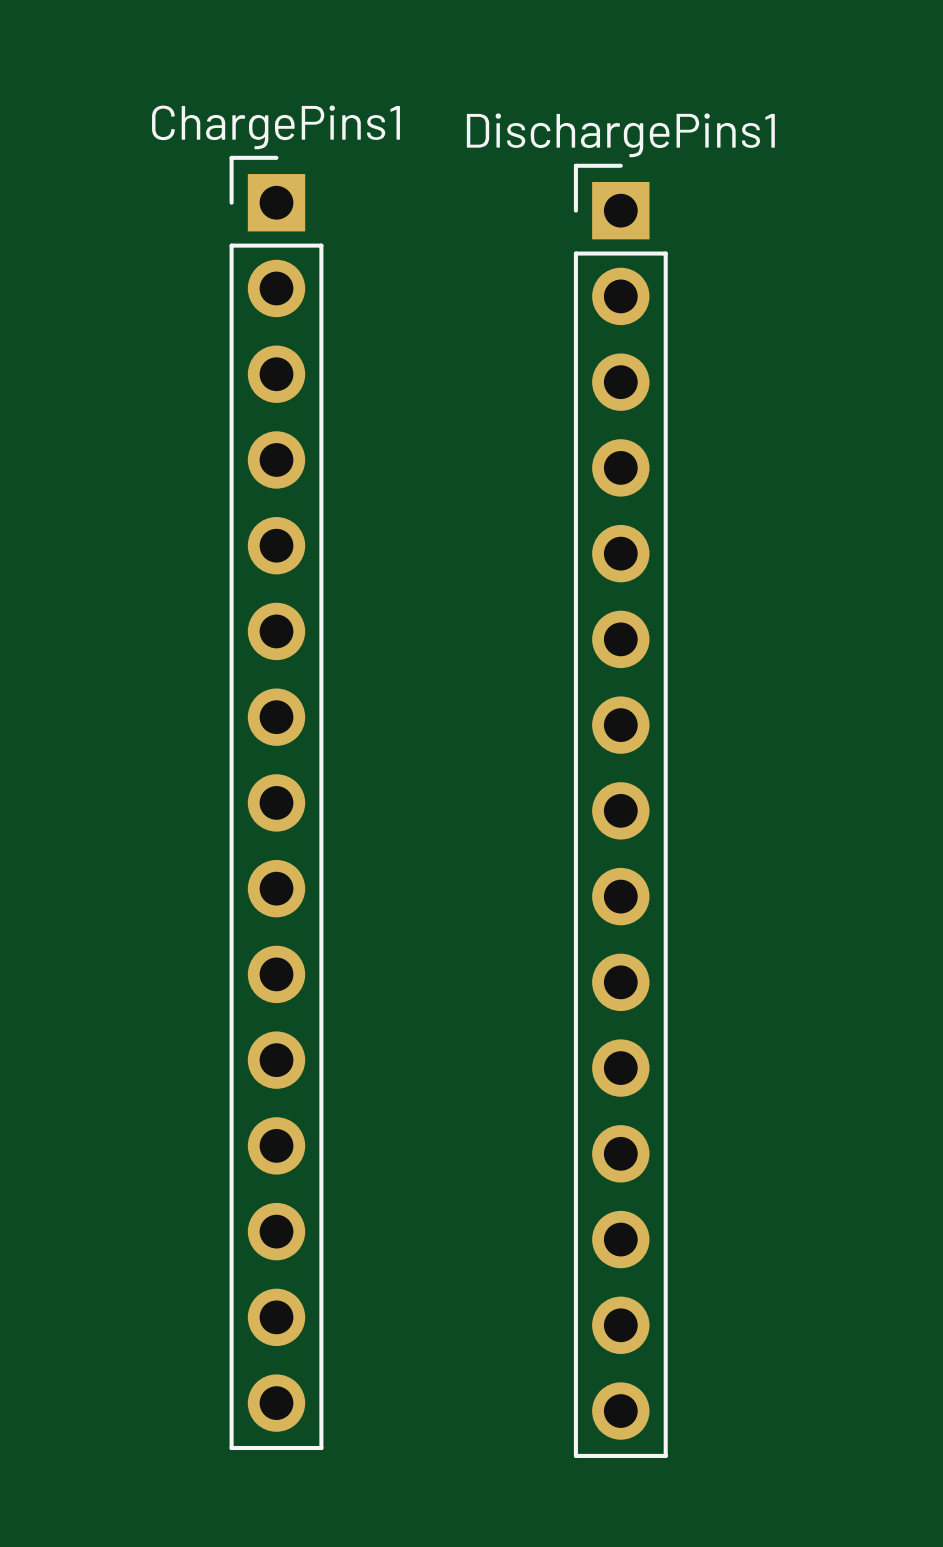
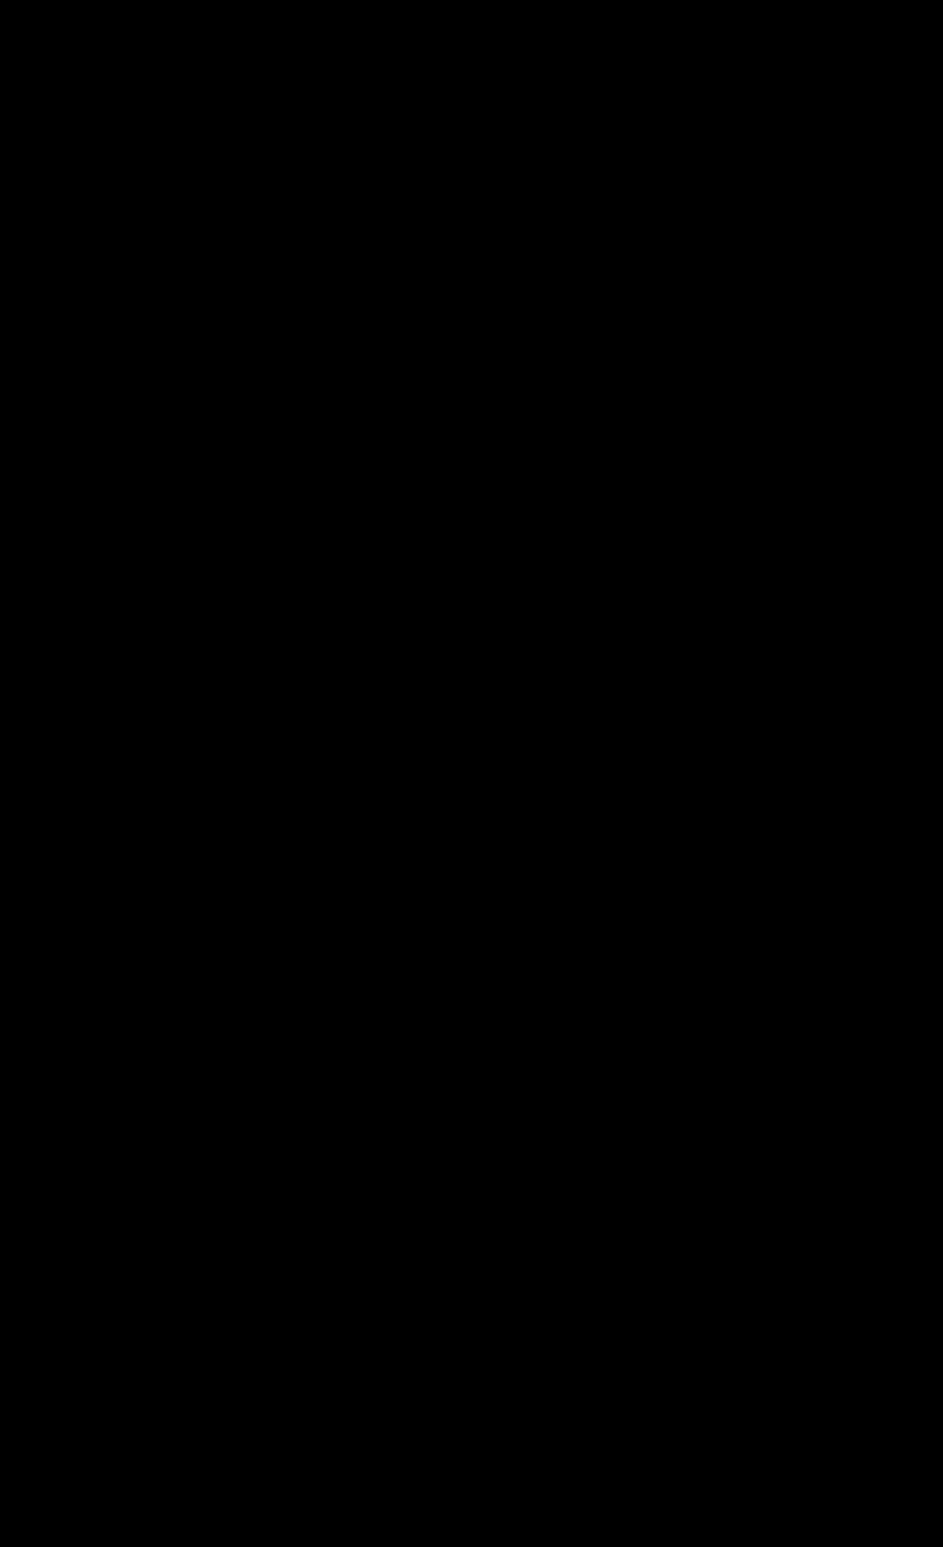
ChargePins1: (276, 802) -> none
DischargePins1: (620, 810) -> none

